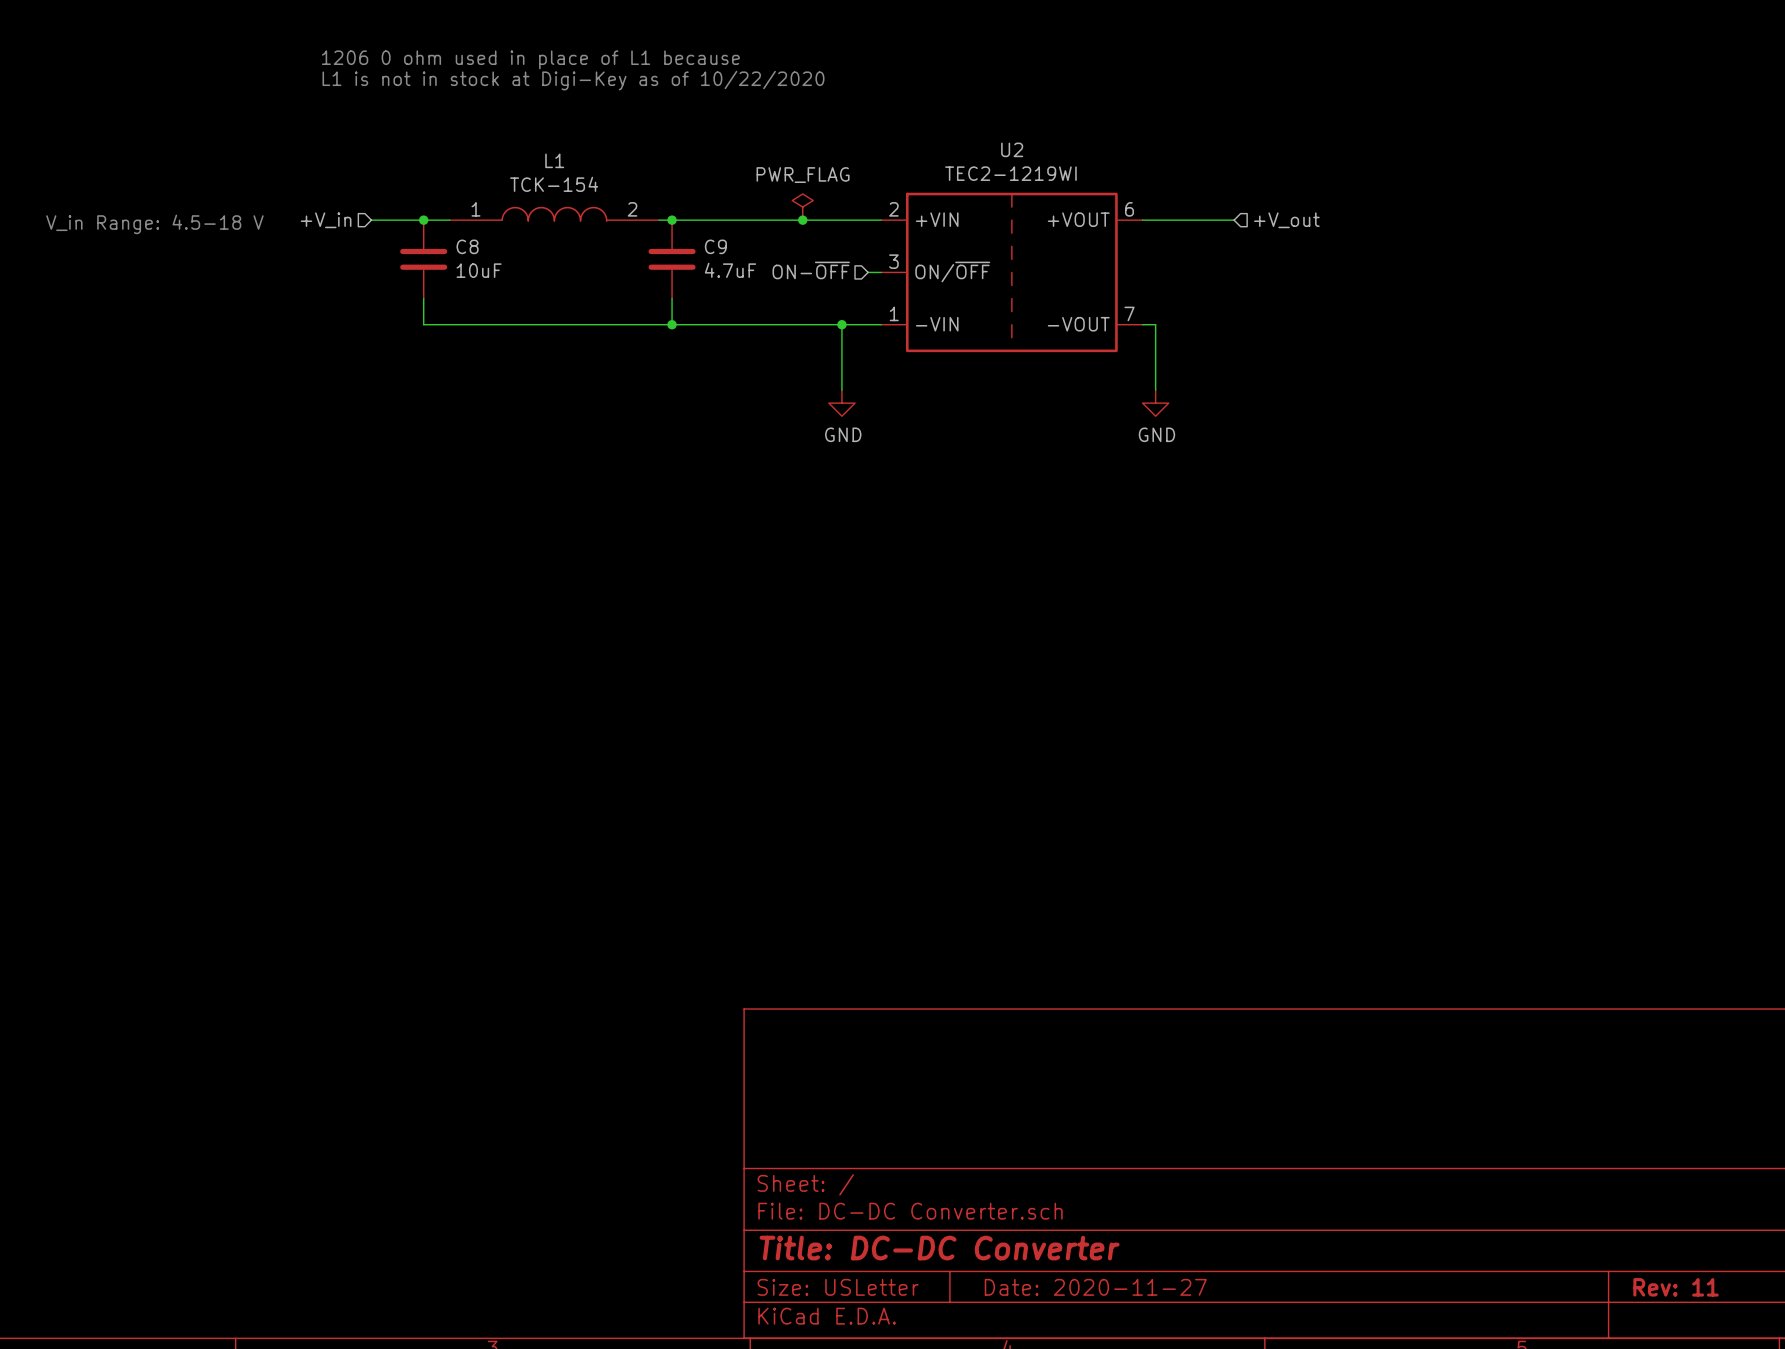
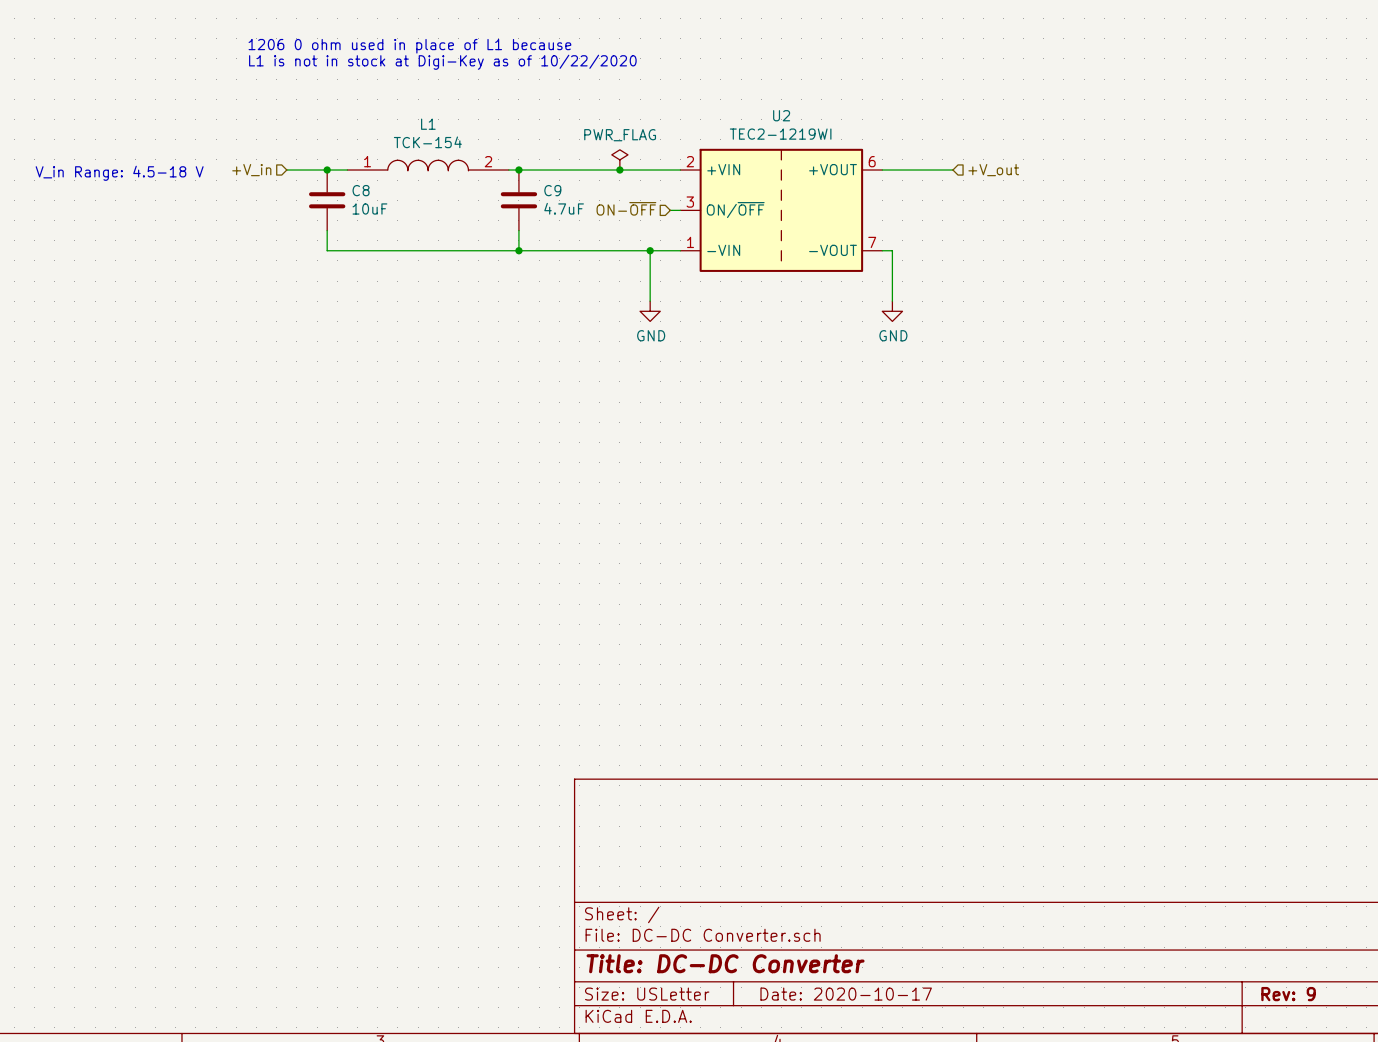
title block: Date: 2020-11-27 (1095, 1287) -> Date: 2020-10-17 (846, 994)
title block: Rev: 11 (1676, 1287) -> Rev: 9 (1288, 994)

